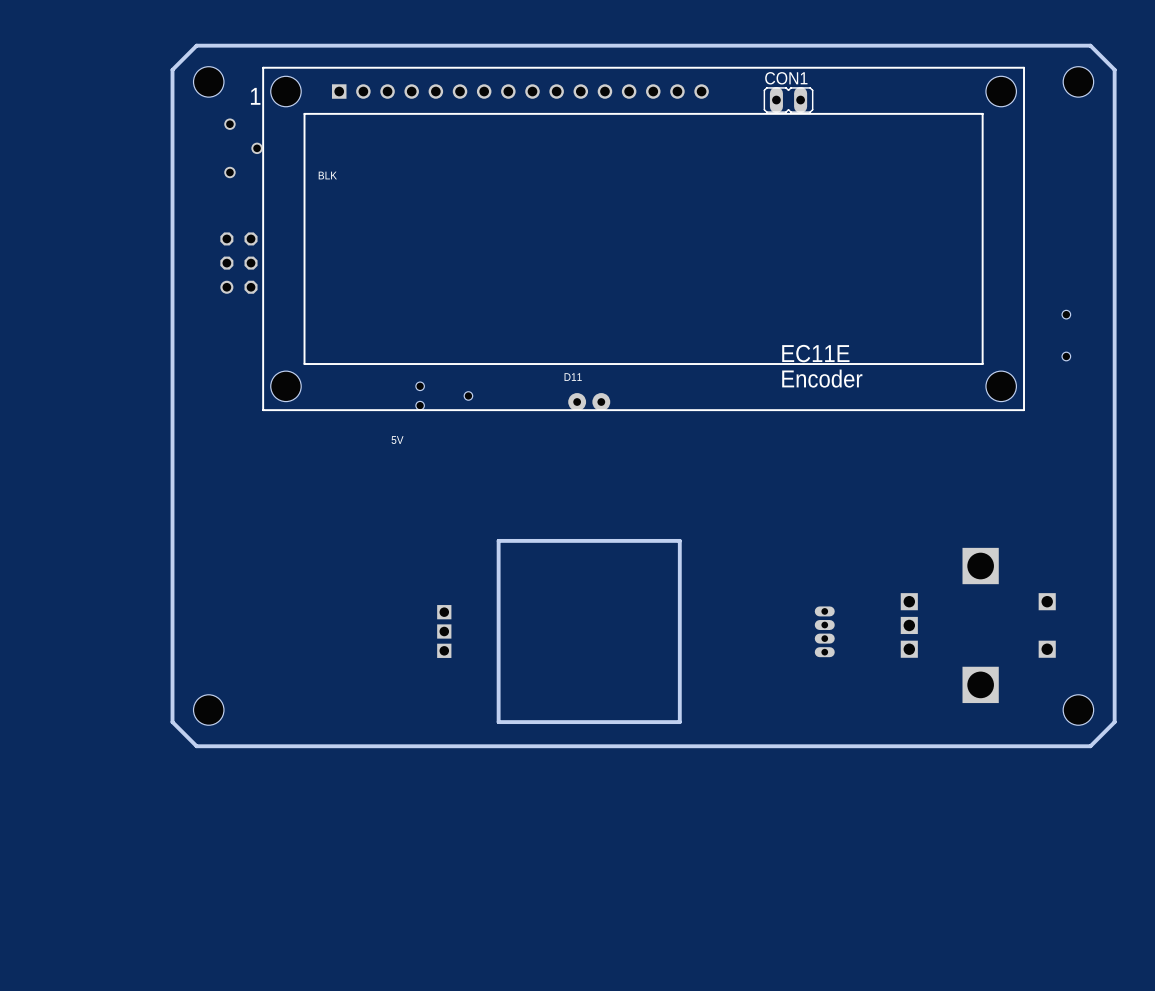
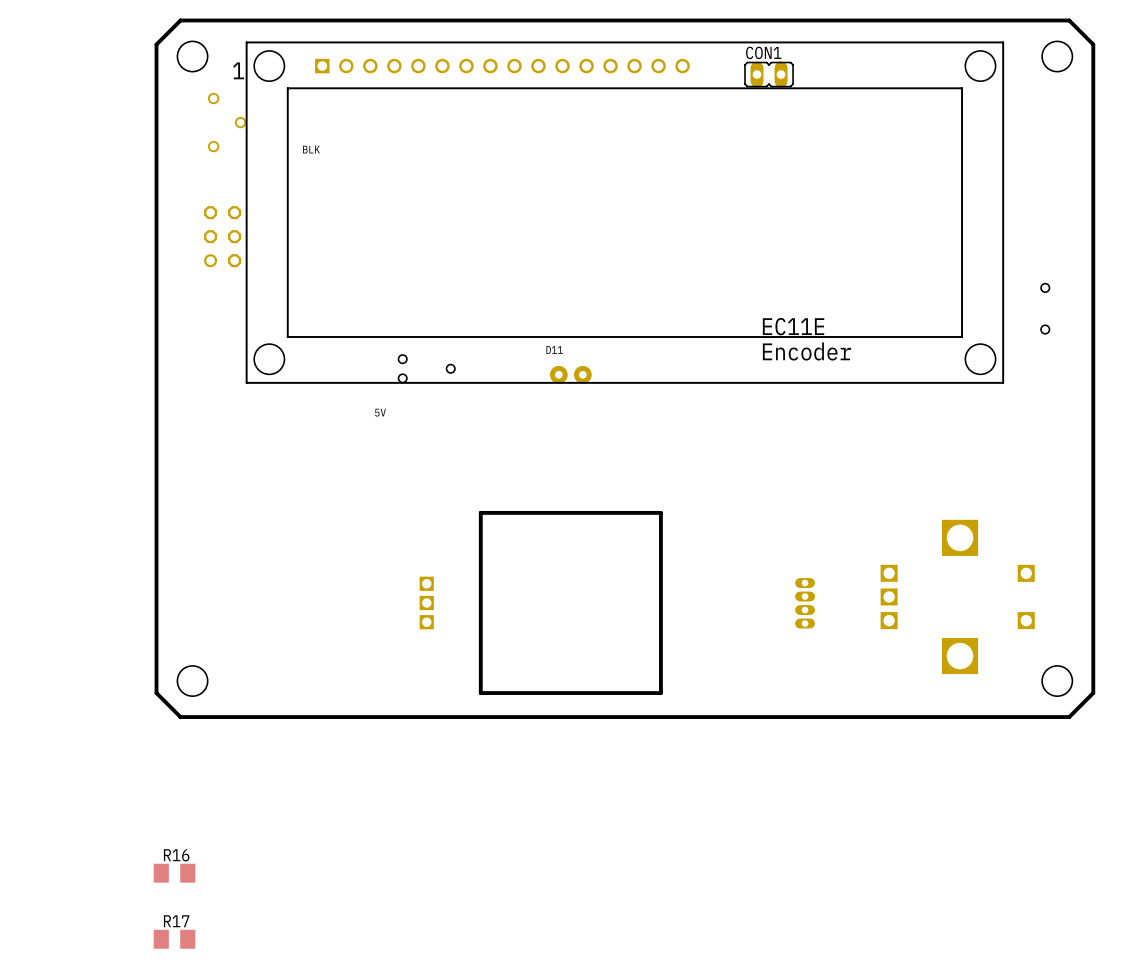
R16: none -> (174, 873)
R17: none -> (174, 939)

